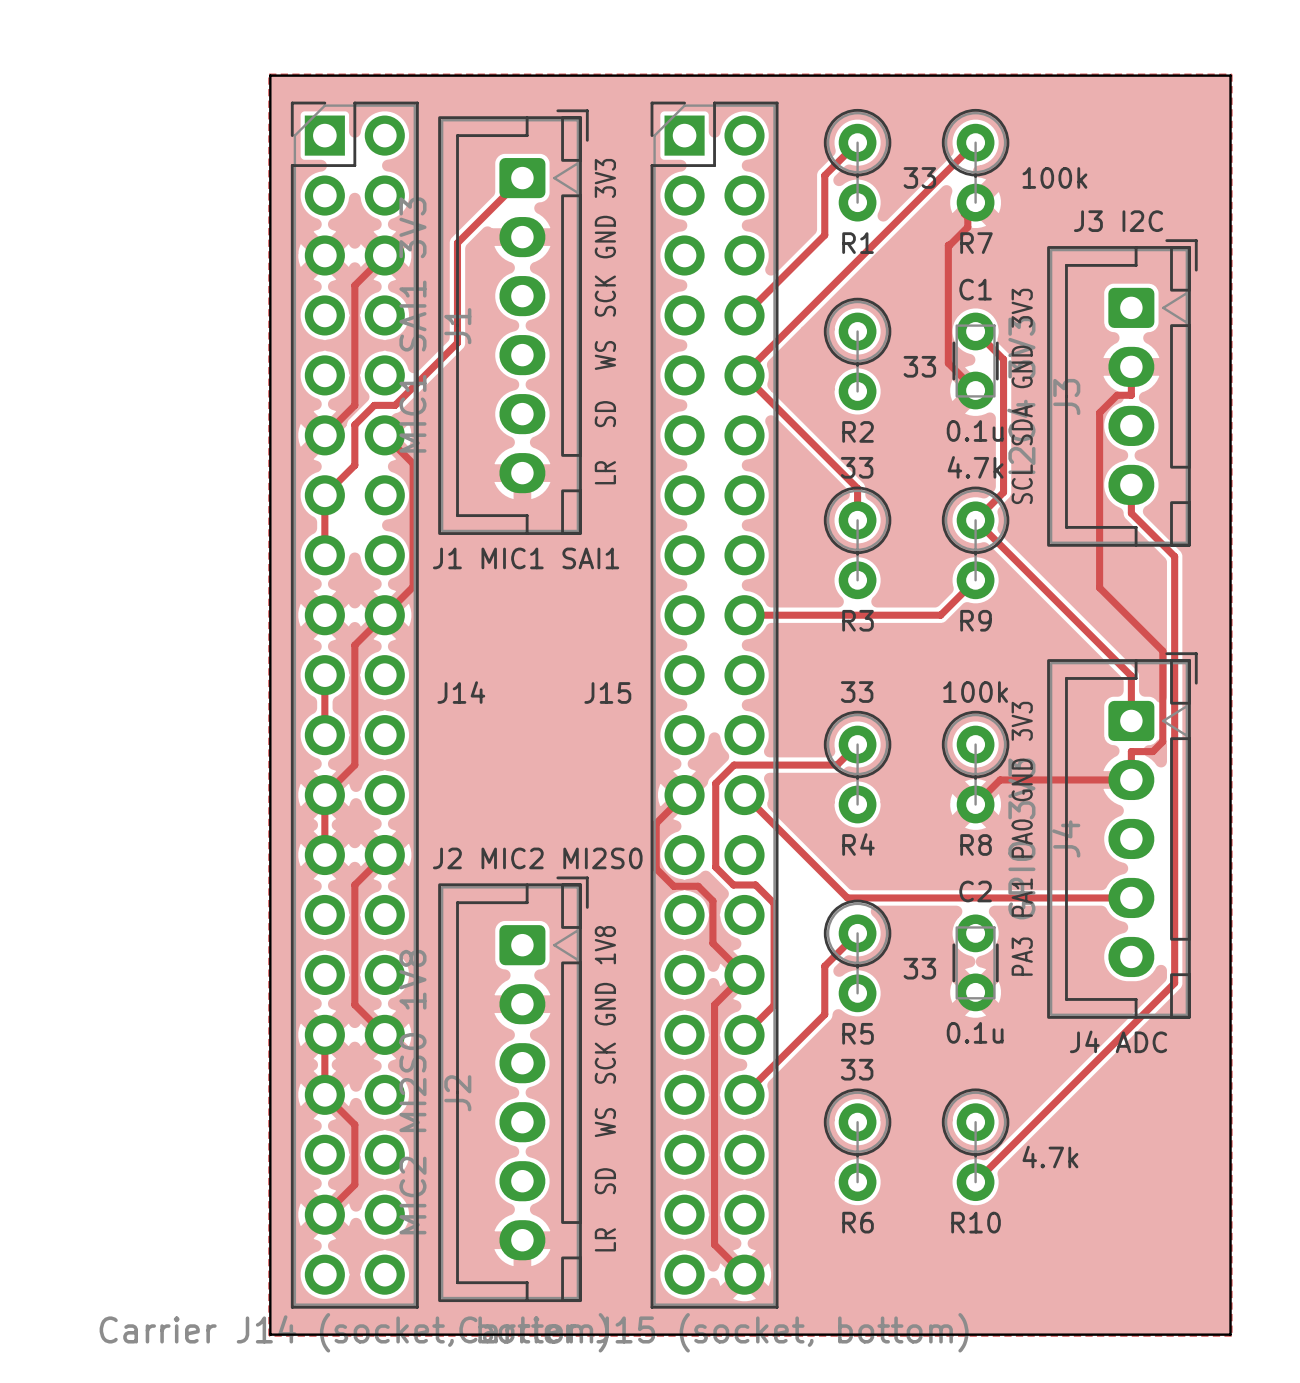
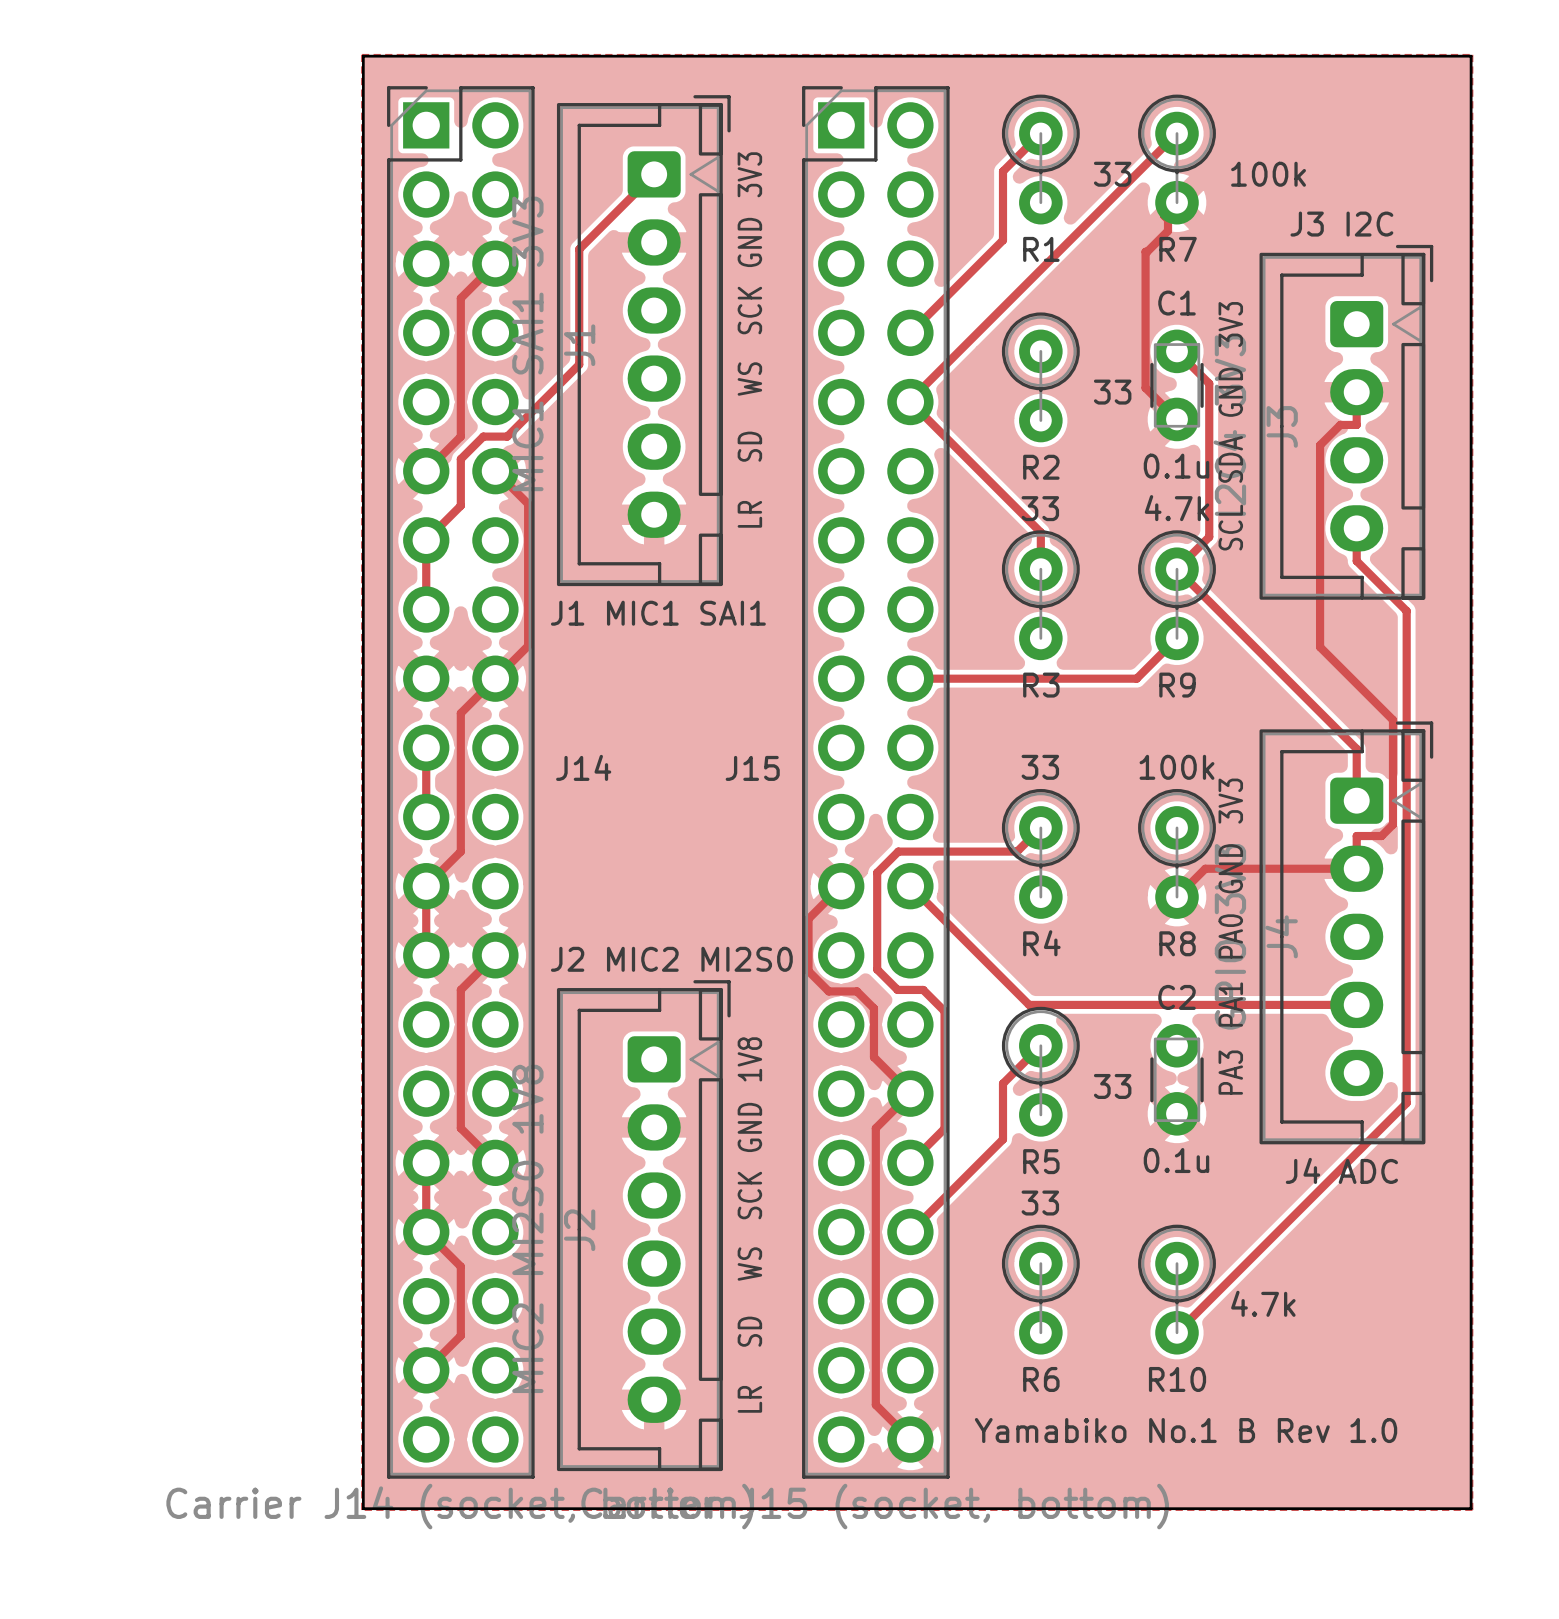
text: none -> Yamabiko No.1 B Rev 1.0 (1186, 1430)

